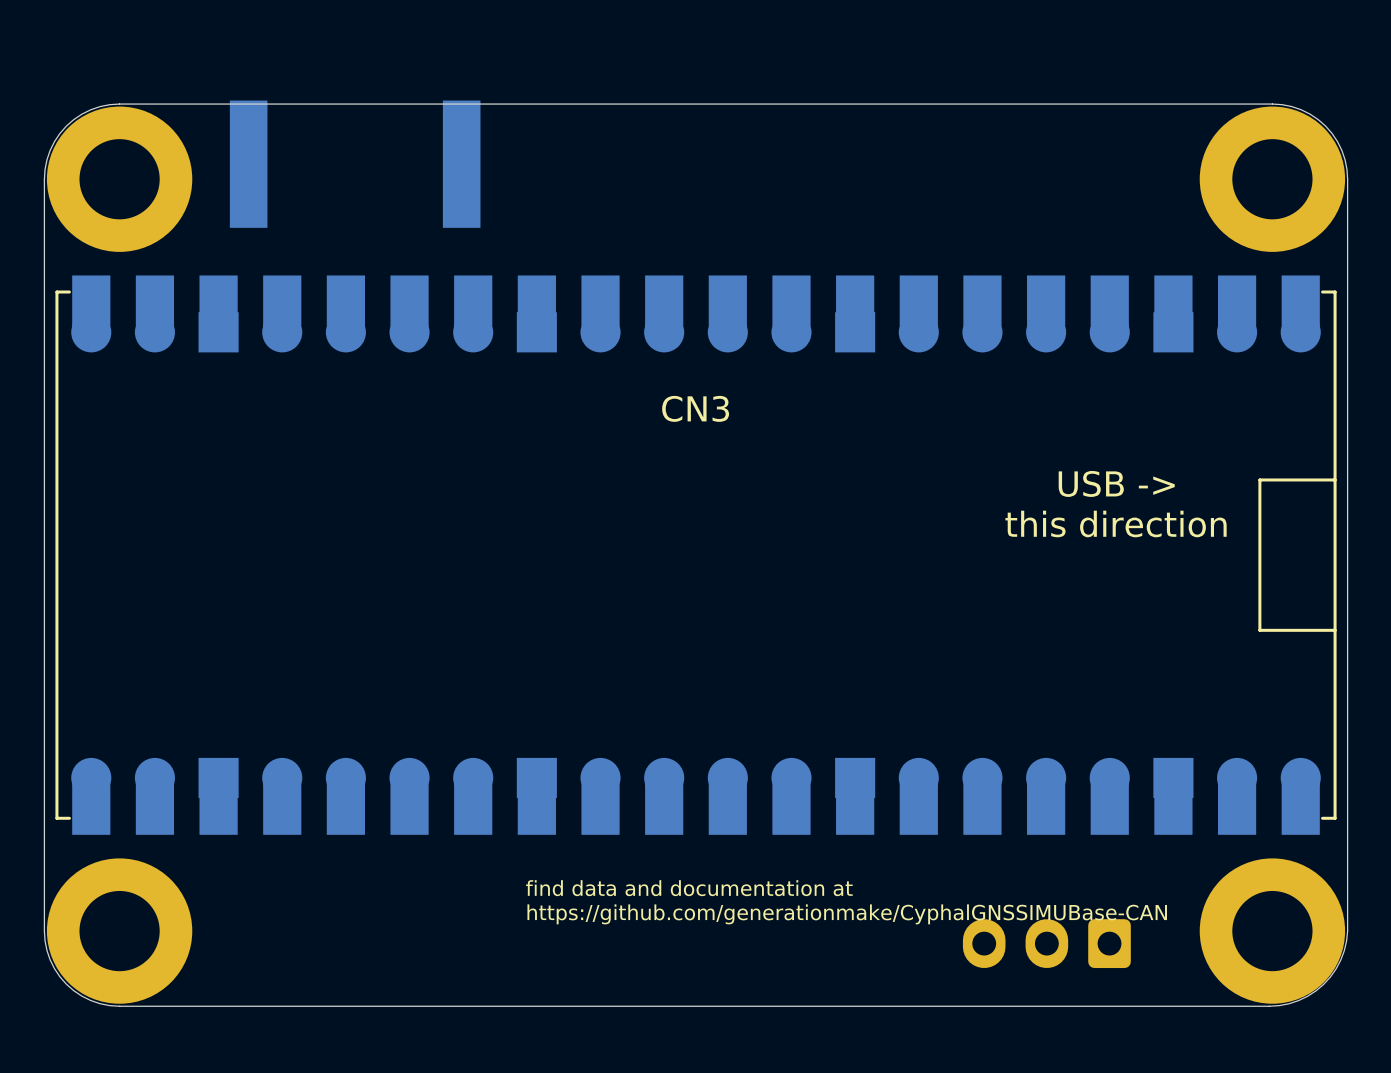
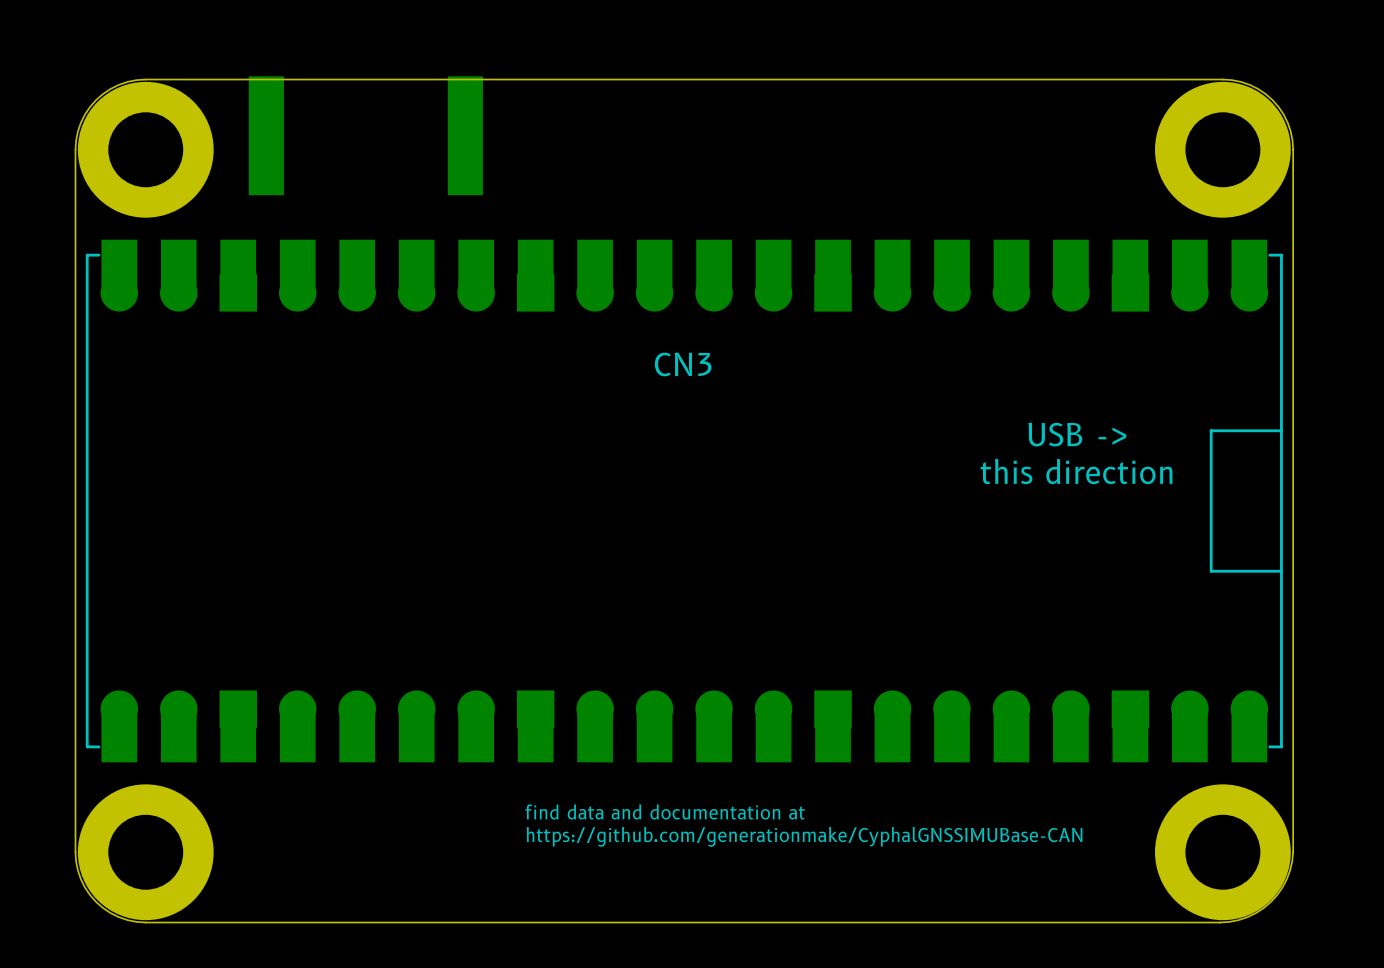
part: (1046, 943) -> none

